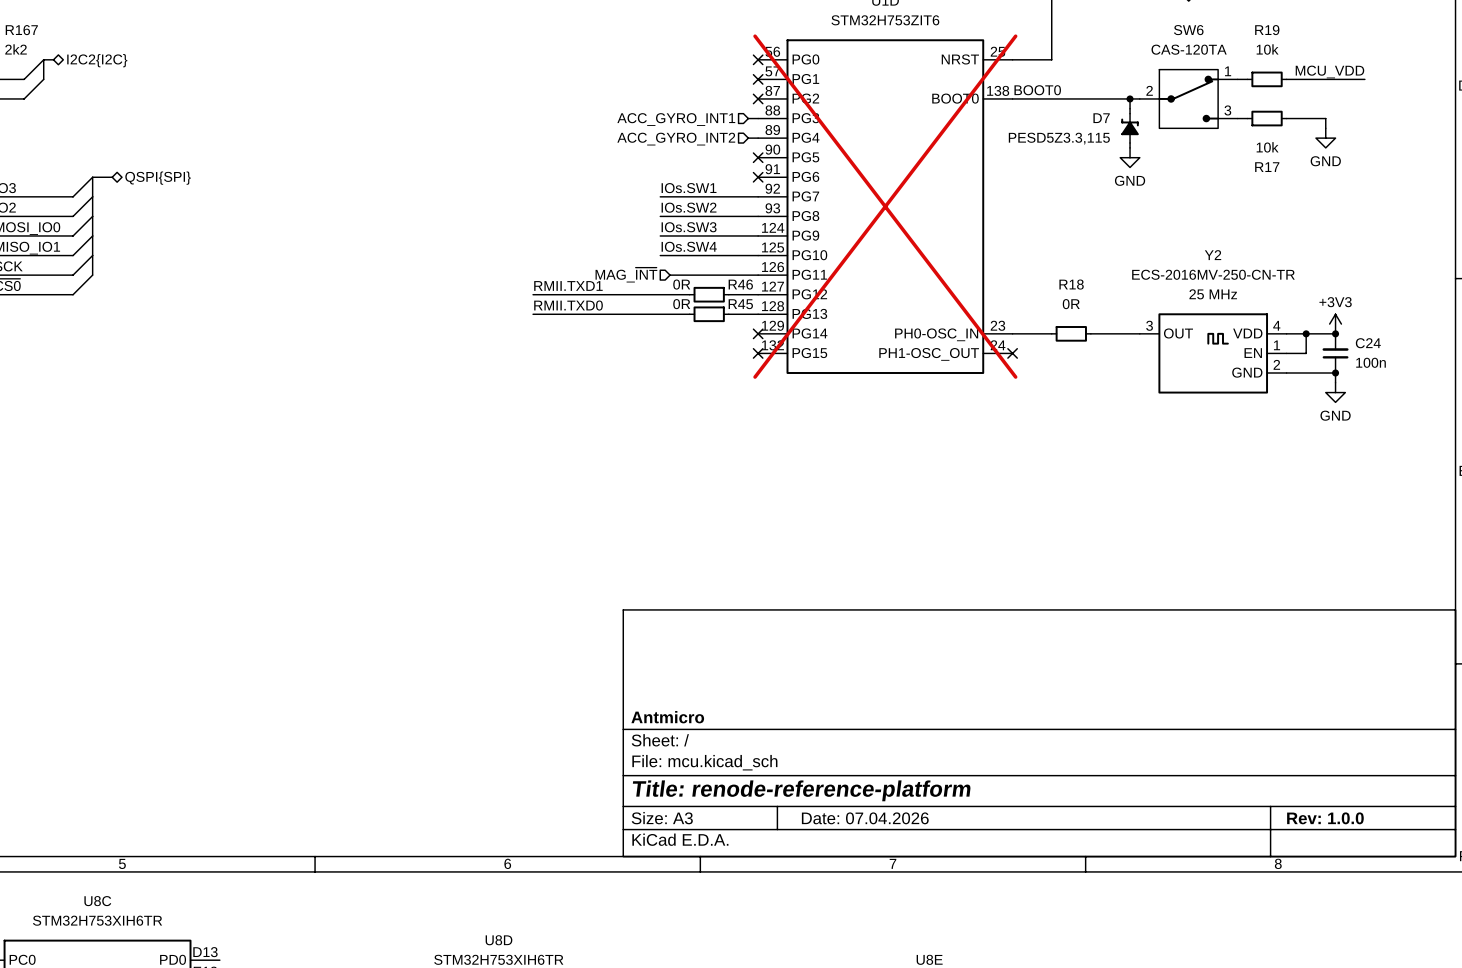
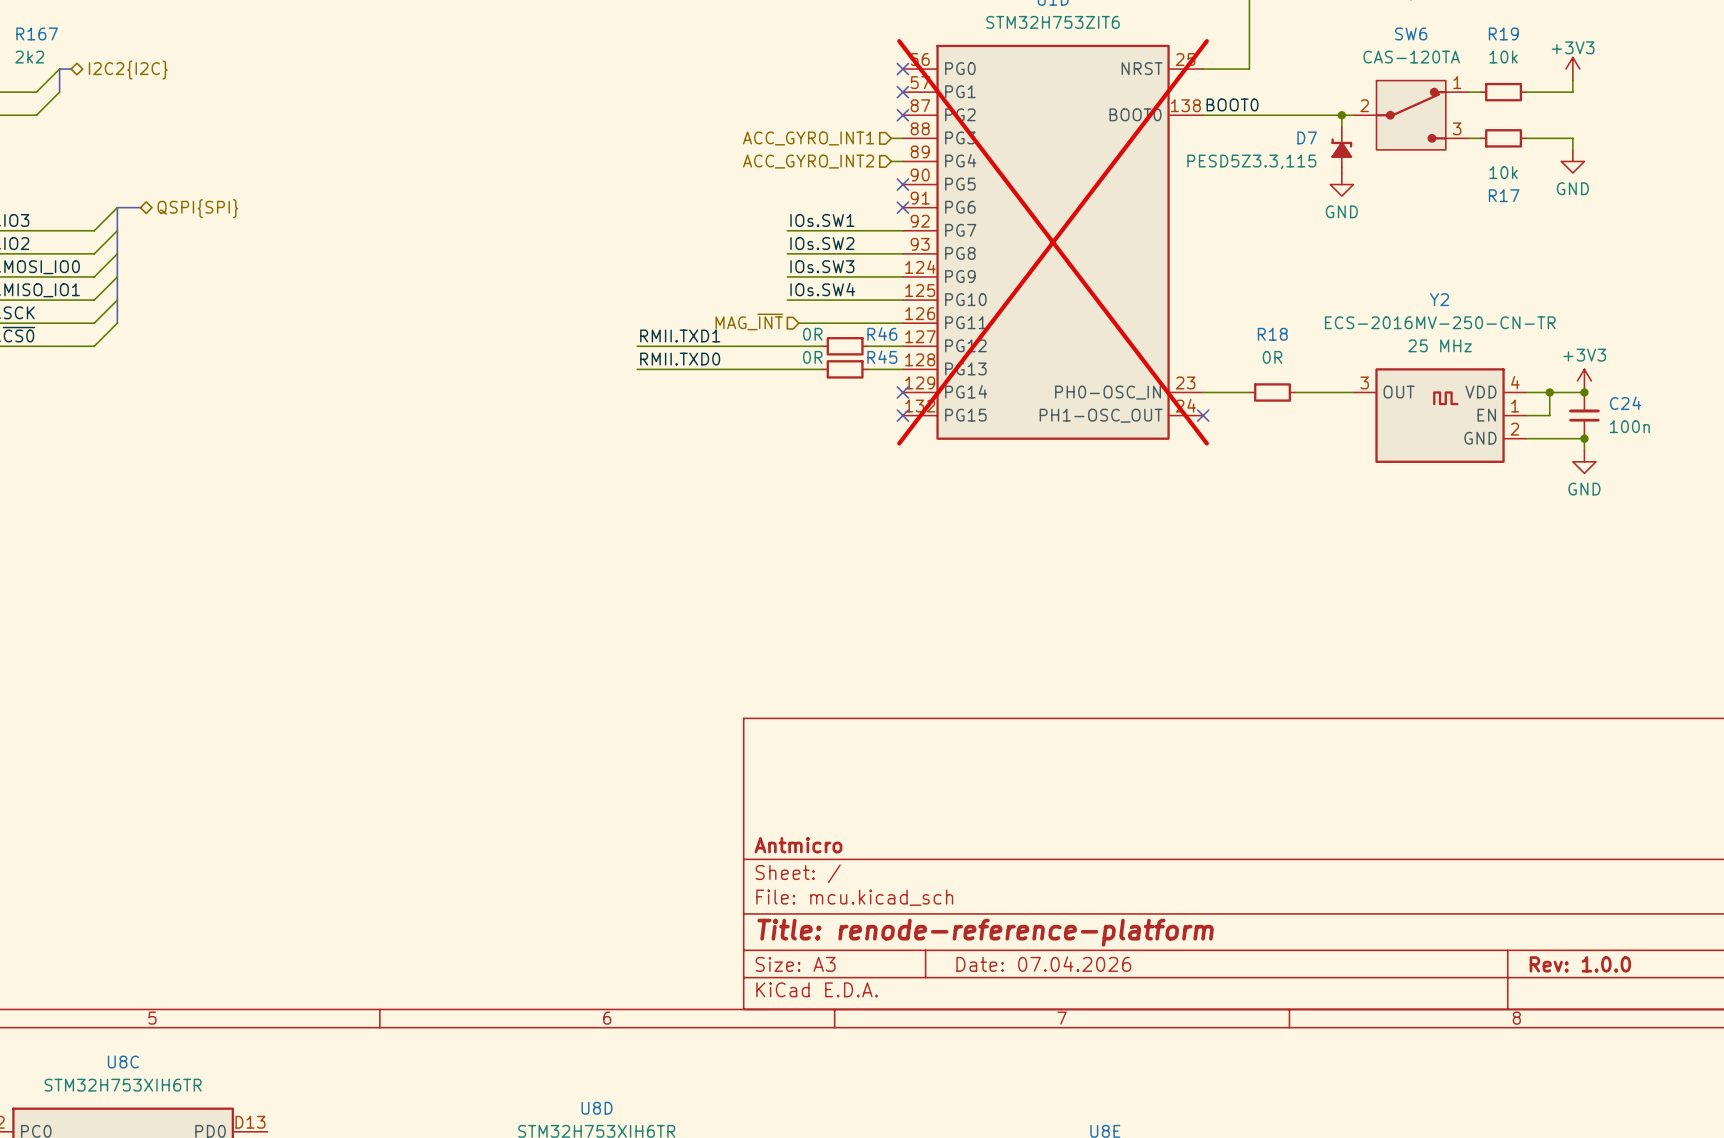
power symbol: none -> +3V3 (1572, 69)
label: MCU_VDD (1329, 72) -> none
wire: (1325, 79) (1364, 79) -> (1572, 92) (1572, 80)

